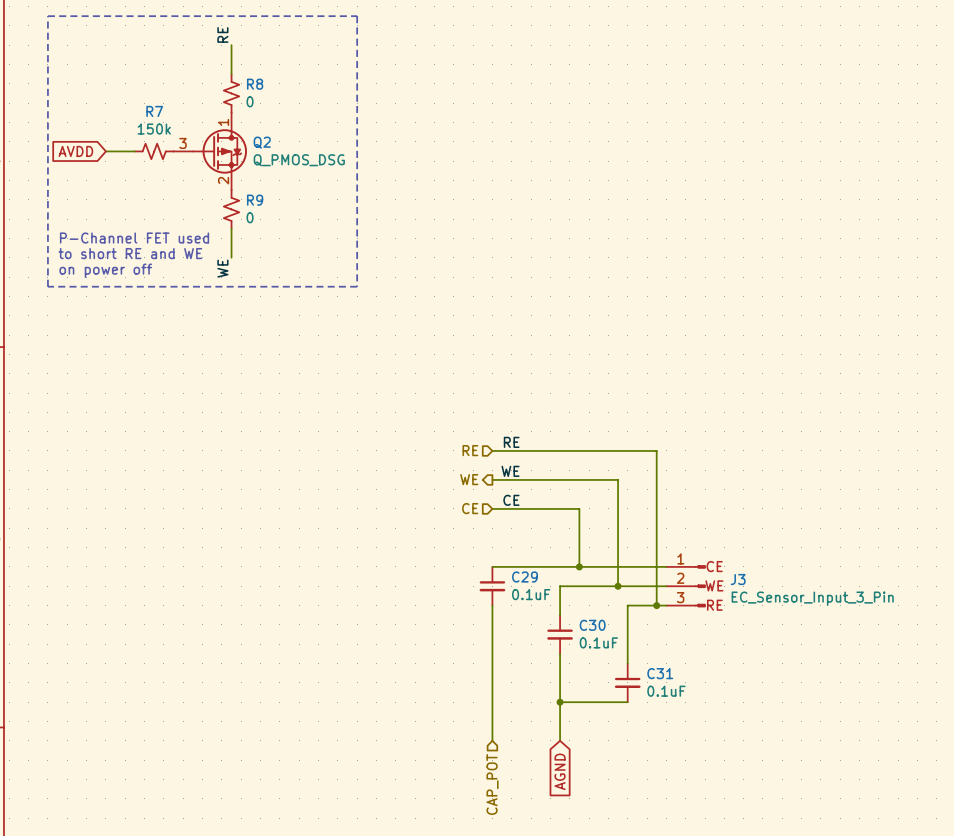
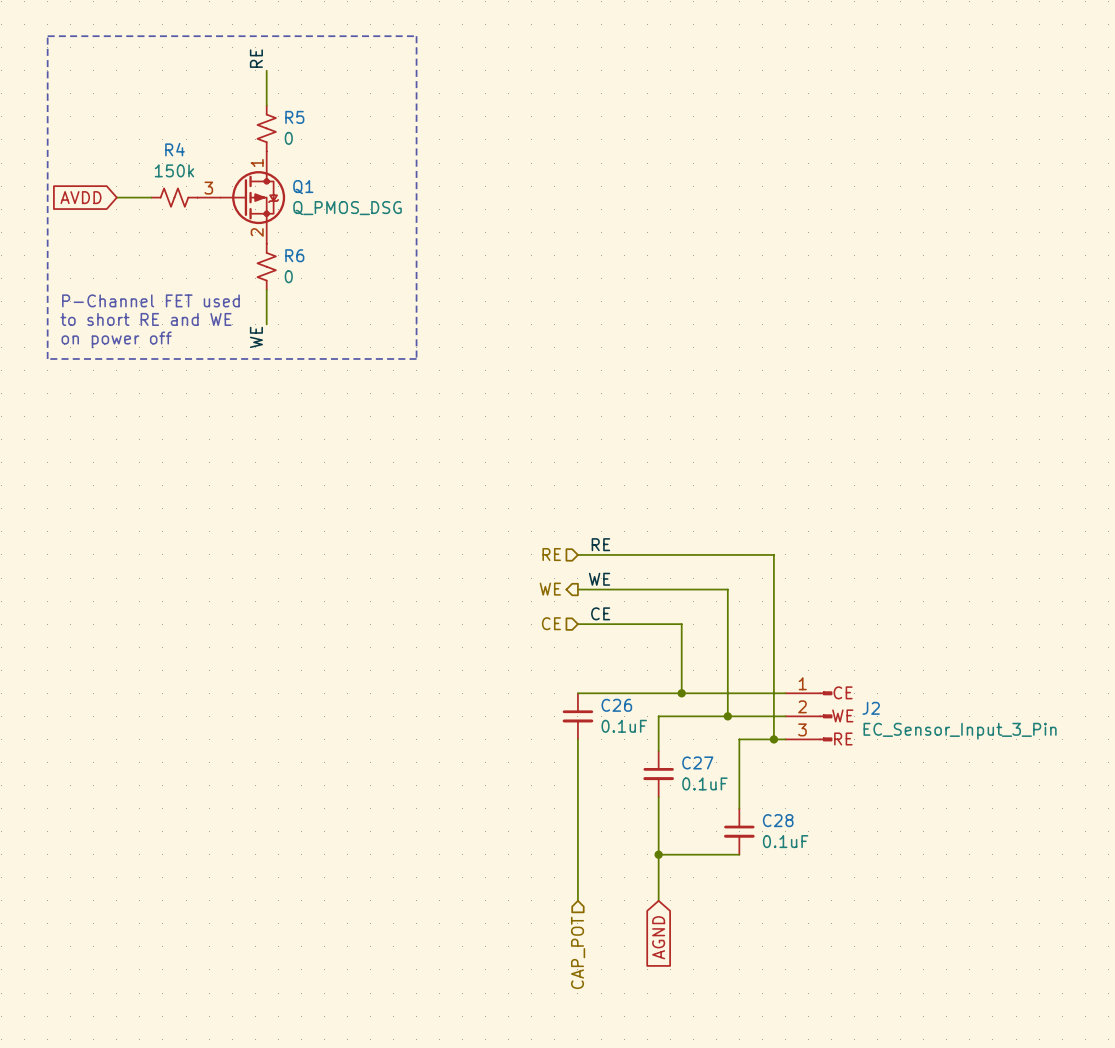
R8 name: R8 (255, 84) -> R5 (294, 117)
R7 name: R7 (154, 111) -> R4 (175, 149)
Q2 name: Q2 (262, 142) -> Q1 (303, 187)
R9 name: R9 (255, 200) -> R6 (294, 255)
C29 name: C29 (525, 577) -> C26 (616, 705)
J3 name: J3 (738, 579) -> J2 (871, 708)
C30 name: C30 (592, 625) -> C27 (697, 762)
C31 name: C31 (660, 673) -> C28 (778, 820)

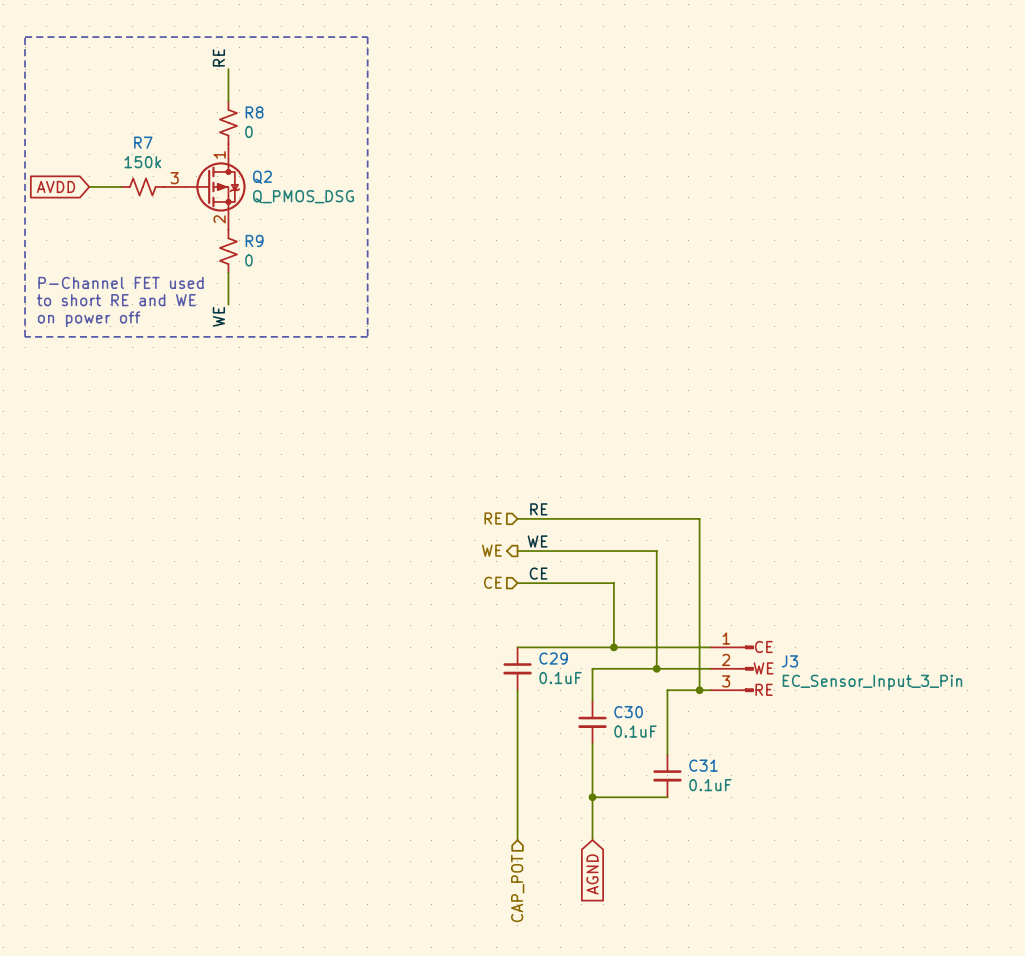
R5 name: R5 (294, 117) -> R8 (254, 112)
R4 name: R4 (175, 149) -> R7 (143, 142)
Q1 name: Q1 (303, 187) -> Q2 (262, 177)
R6 name: R6 (294, 255) -> R9 (254, 240)
C26 name: C26 (616, 705) -> C29 (553, 658)
J2 name: J2 (871, 708) -> J3 (789, 661)
C27 name: C27 (697, 762) -> C30 (628, 712)
C28 name: C28 (778, 820) -> C31 (703, 765)

